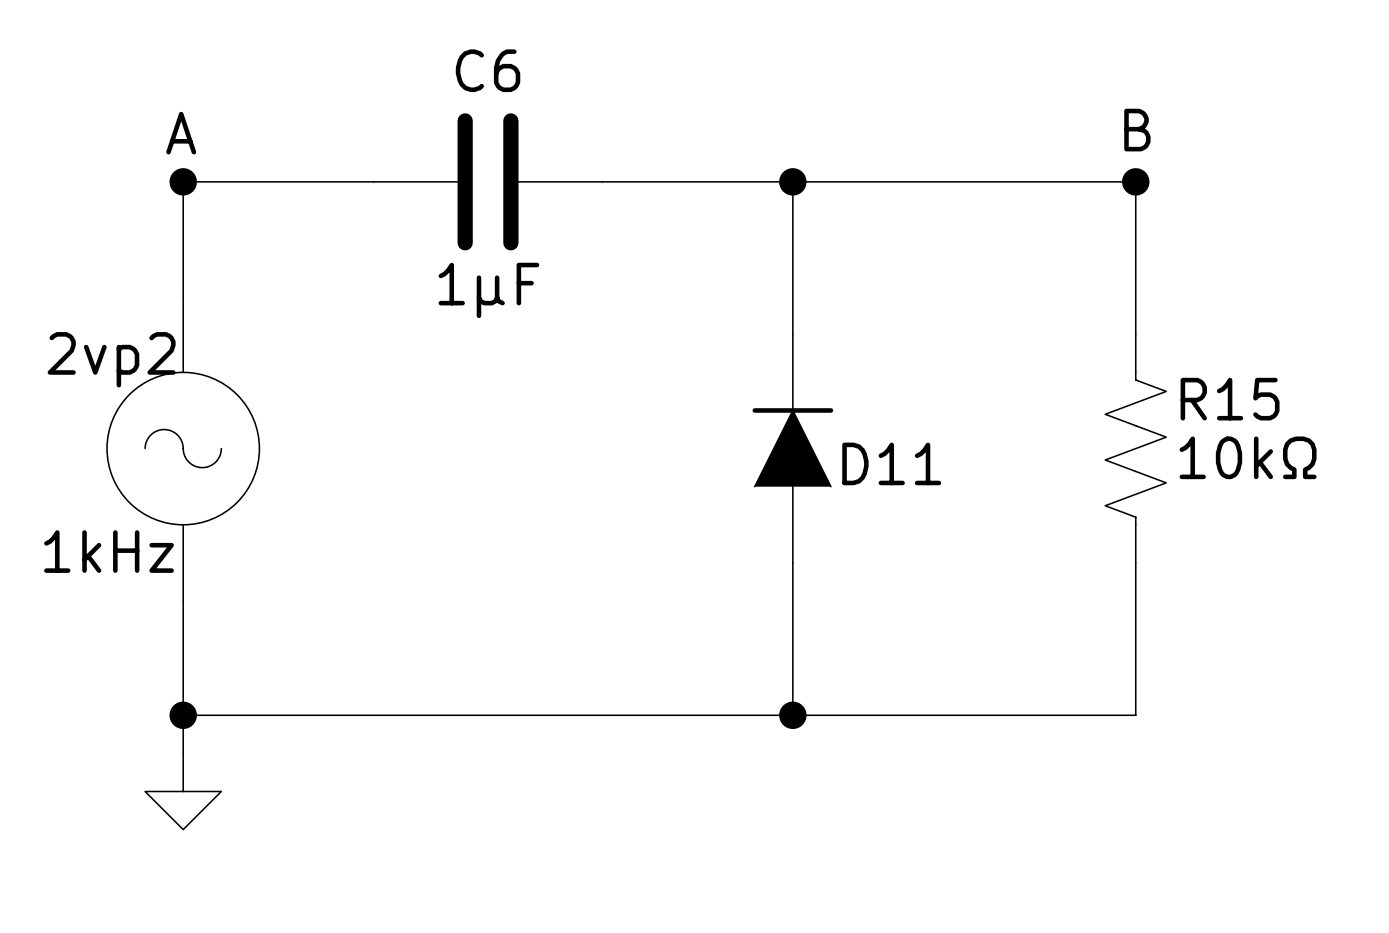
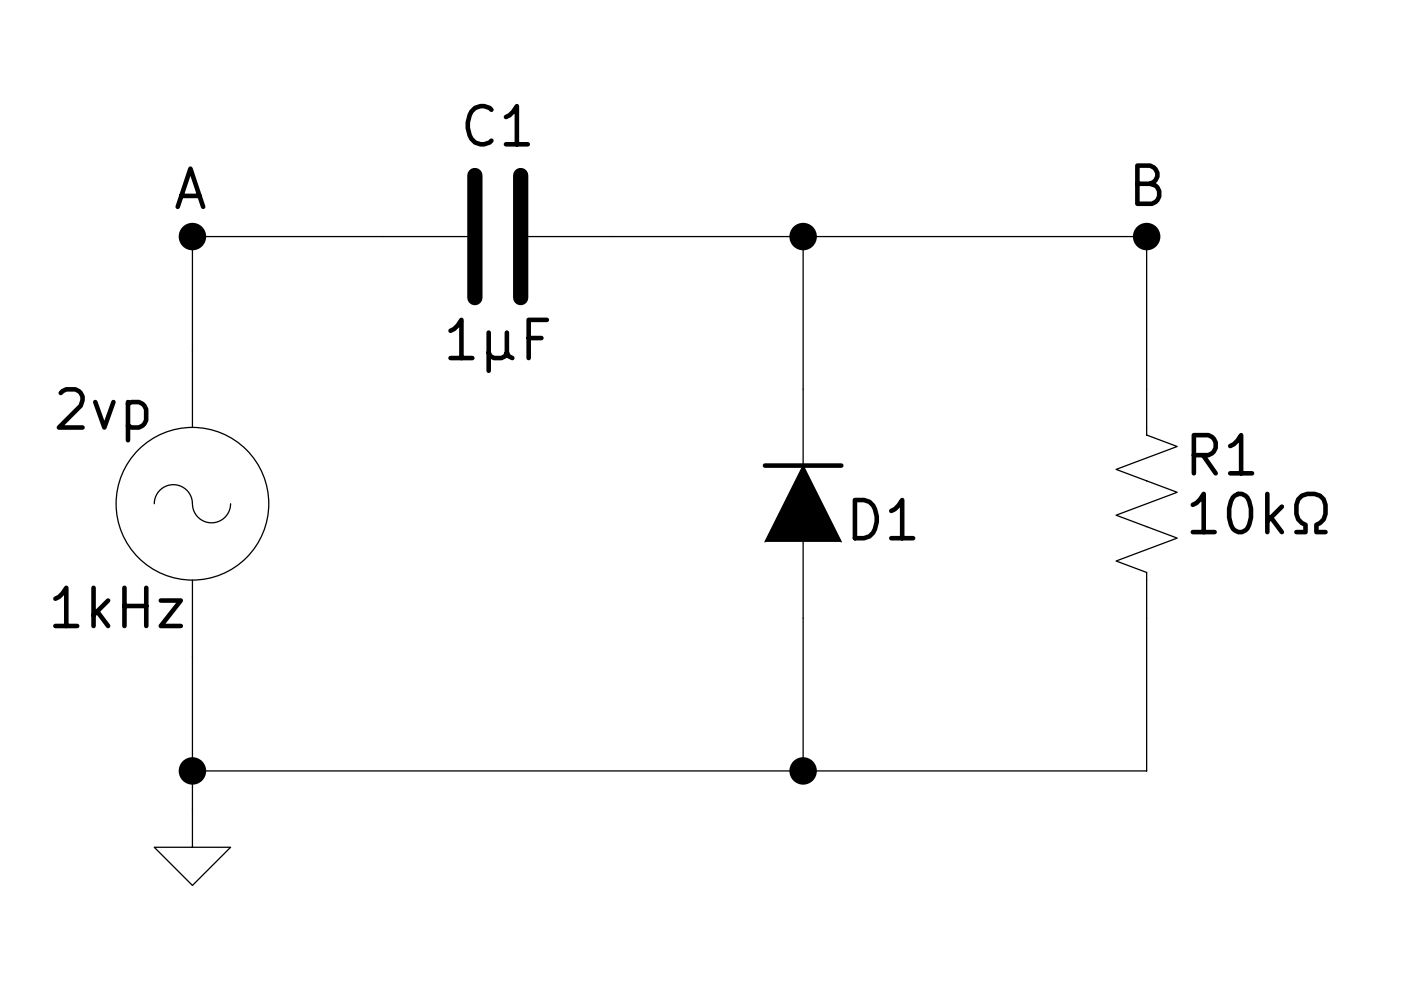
C6 name: C6 (488, 70) -> C1 (497, 125)
2vp2 name: 2vp2 (111, 359) -> 2vp (102, 414)
R15 name: R15 (1230, 399) -> R1 (1222, 454)
D11 name: D11 (891, 463) -> D1 (884, 519)

